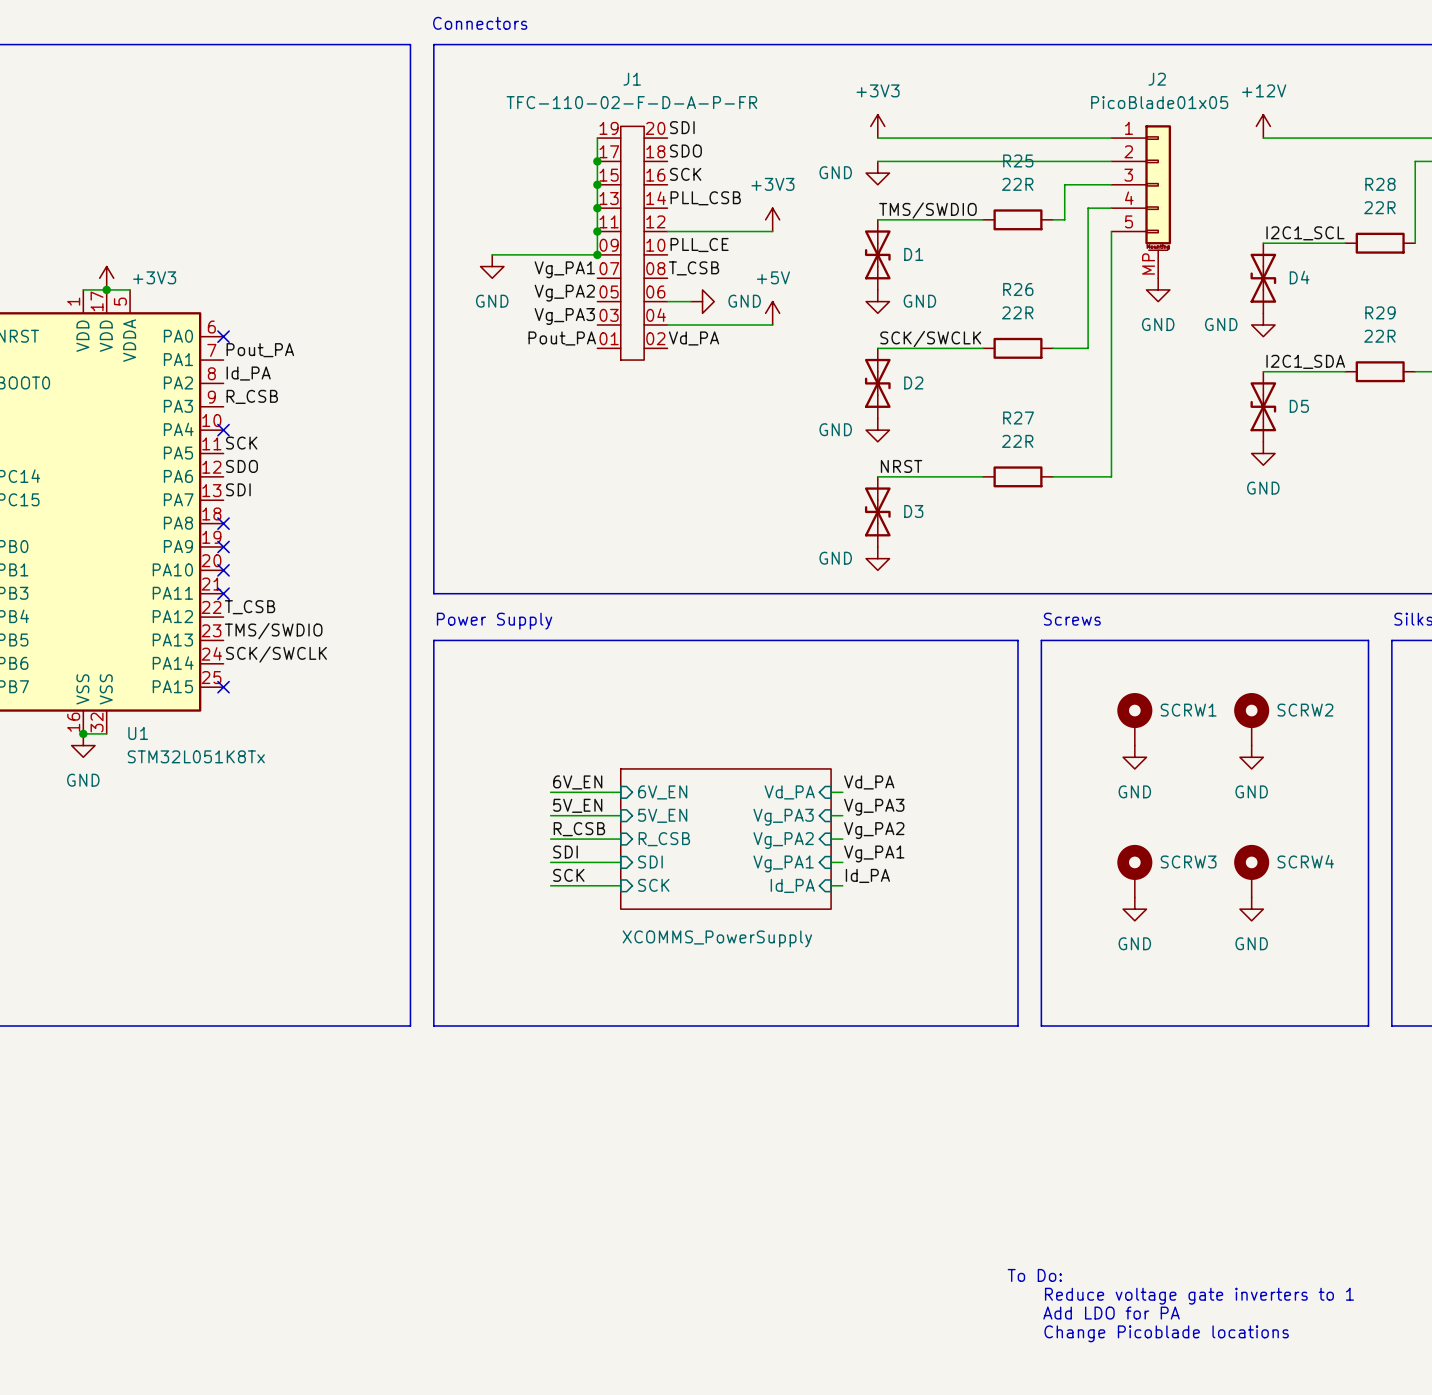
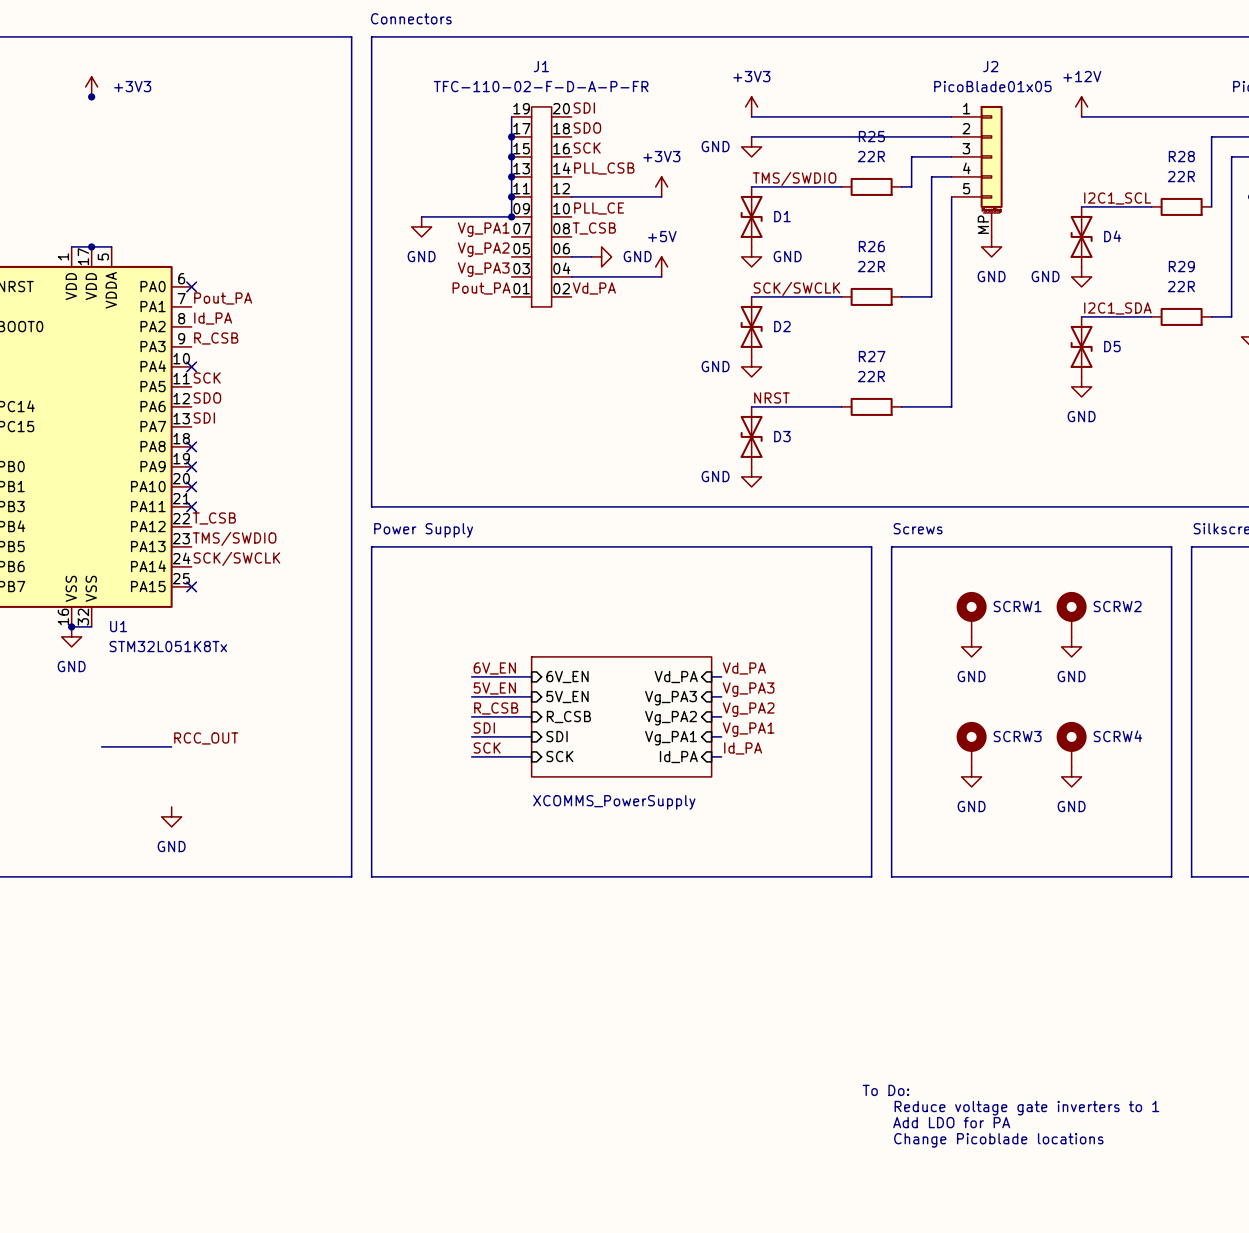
junction: none -> (91, 96)
power symbol position: +3V3 (106, 278) -> +3V3 (91, 86)
label: none -> RCC_OUT (206, 738)
wire: none -> (101, 746) (171, 746)
power symbol: none -> GND (171, 816)

